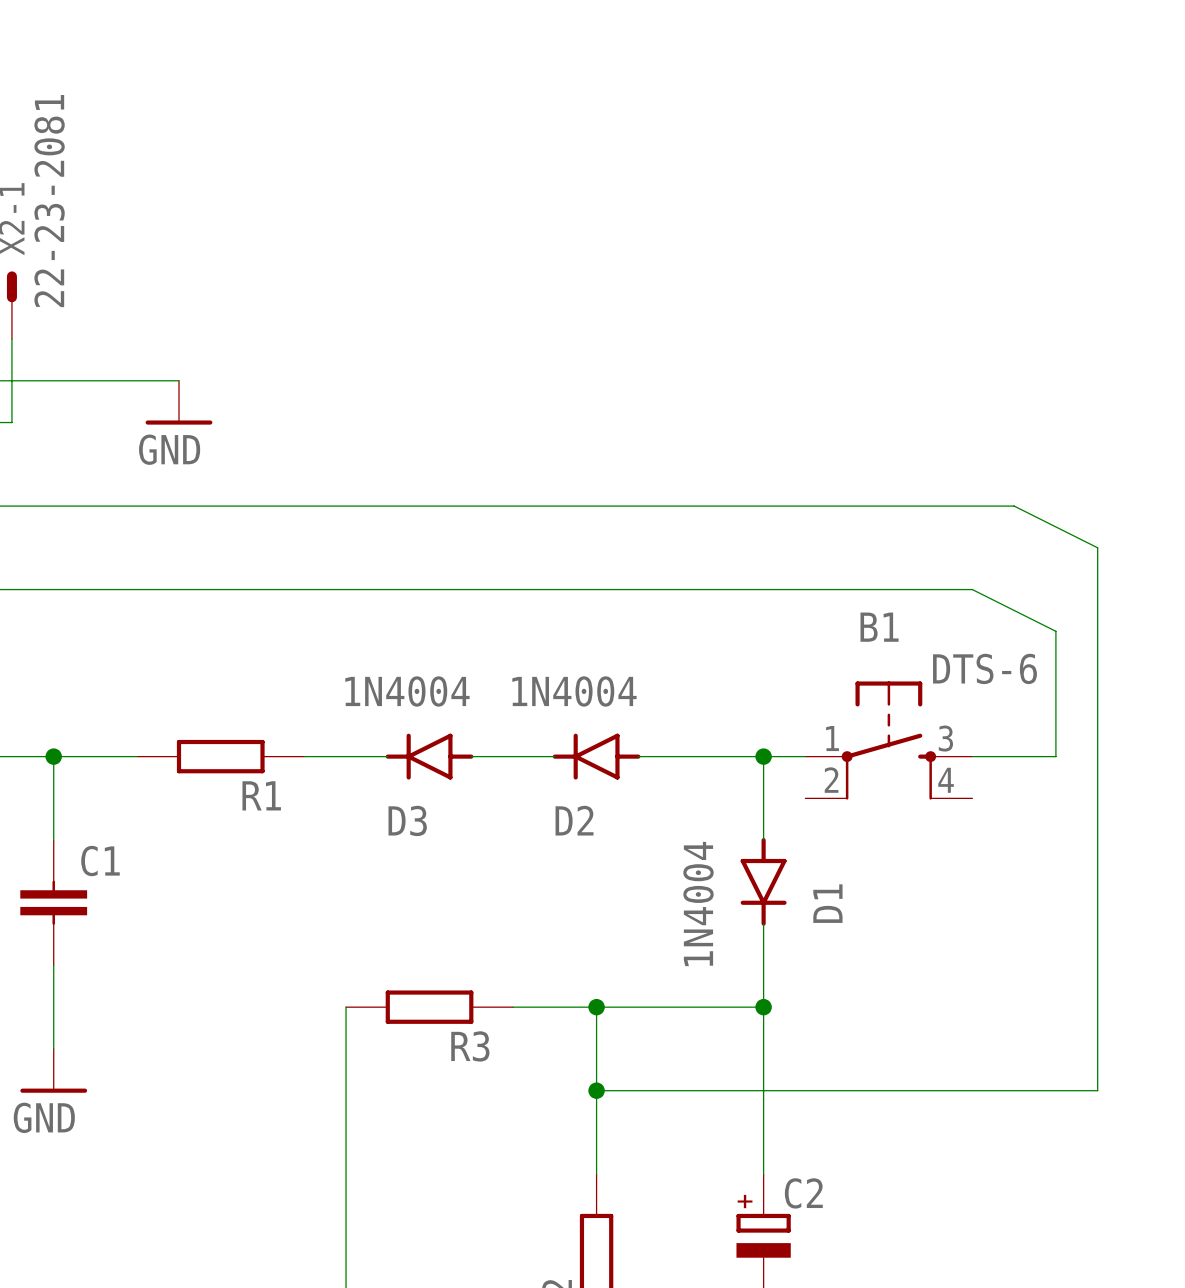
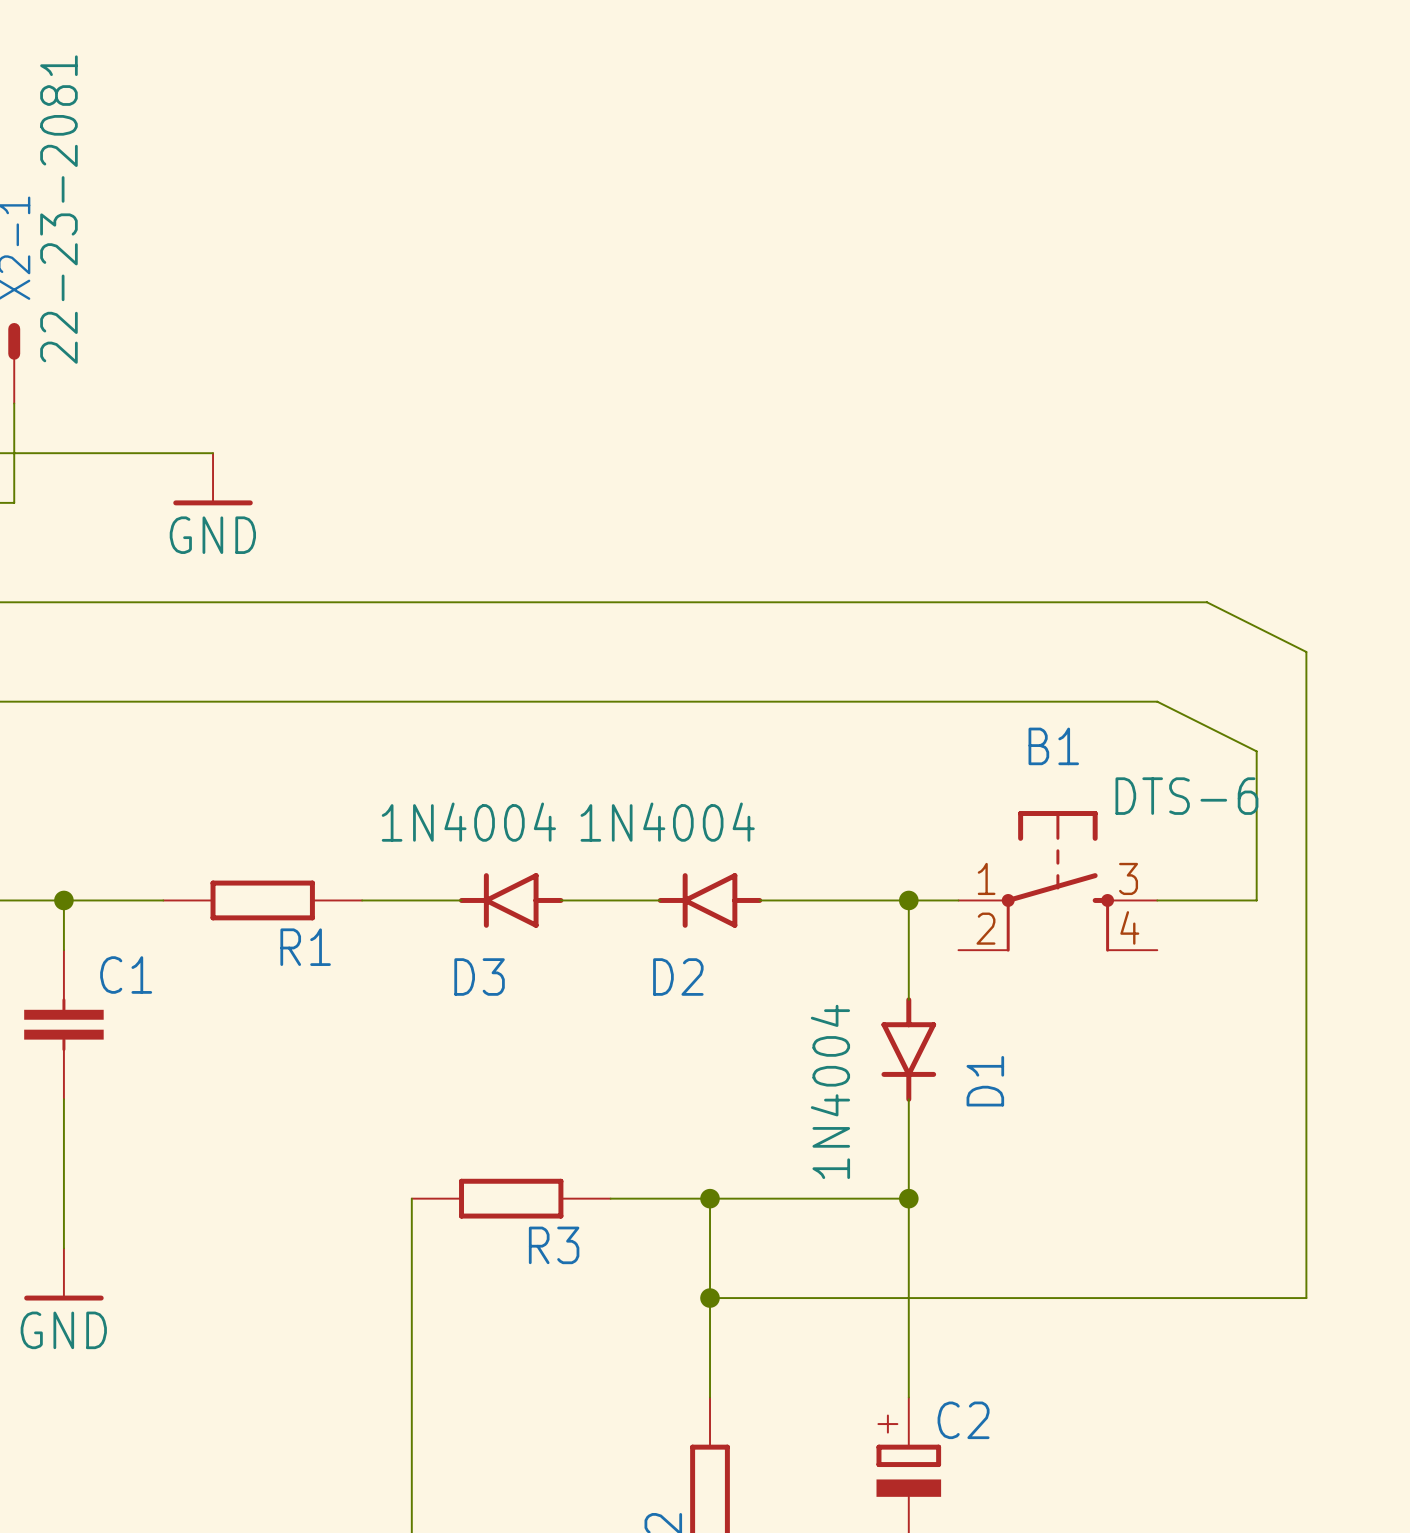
C1 position: (53, 902) -> (63, 1024)

